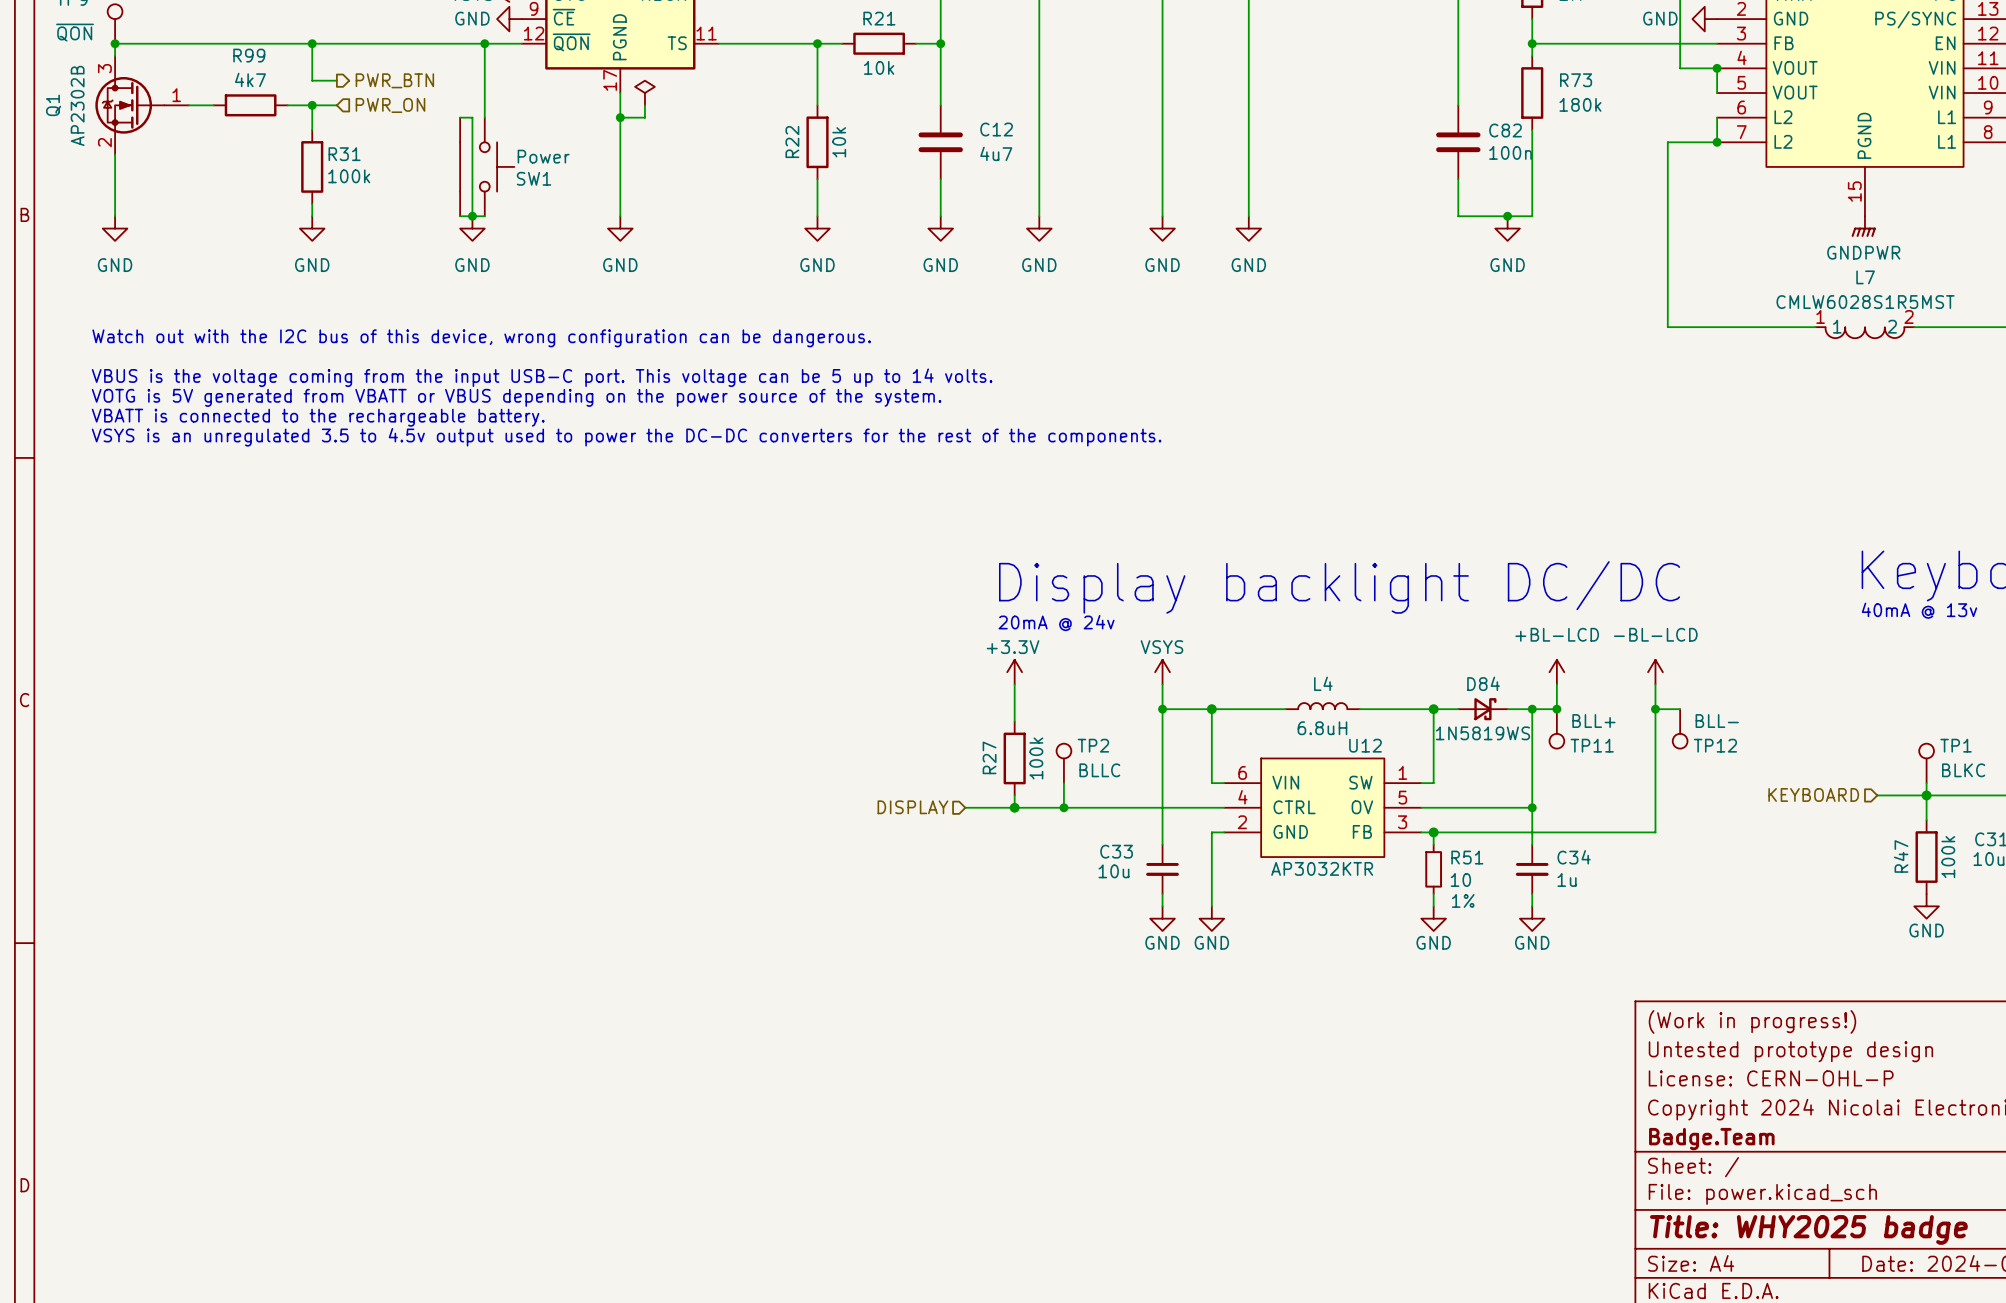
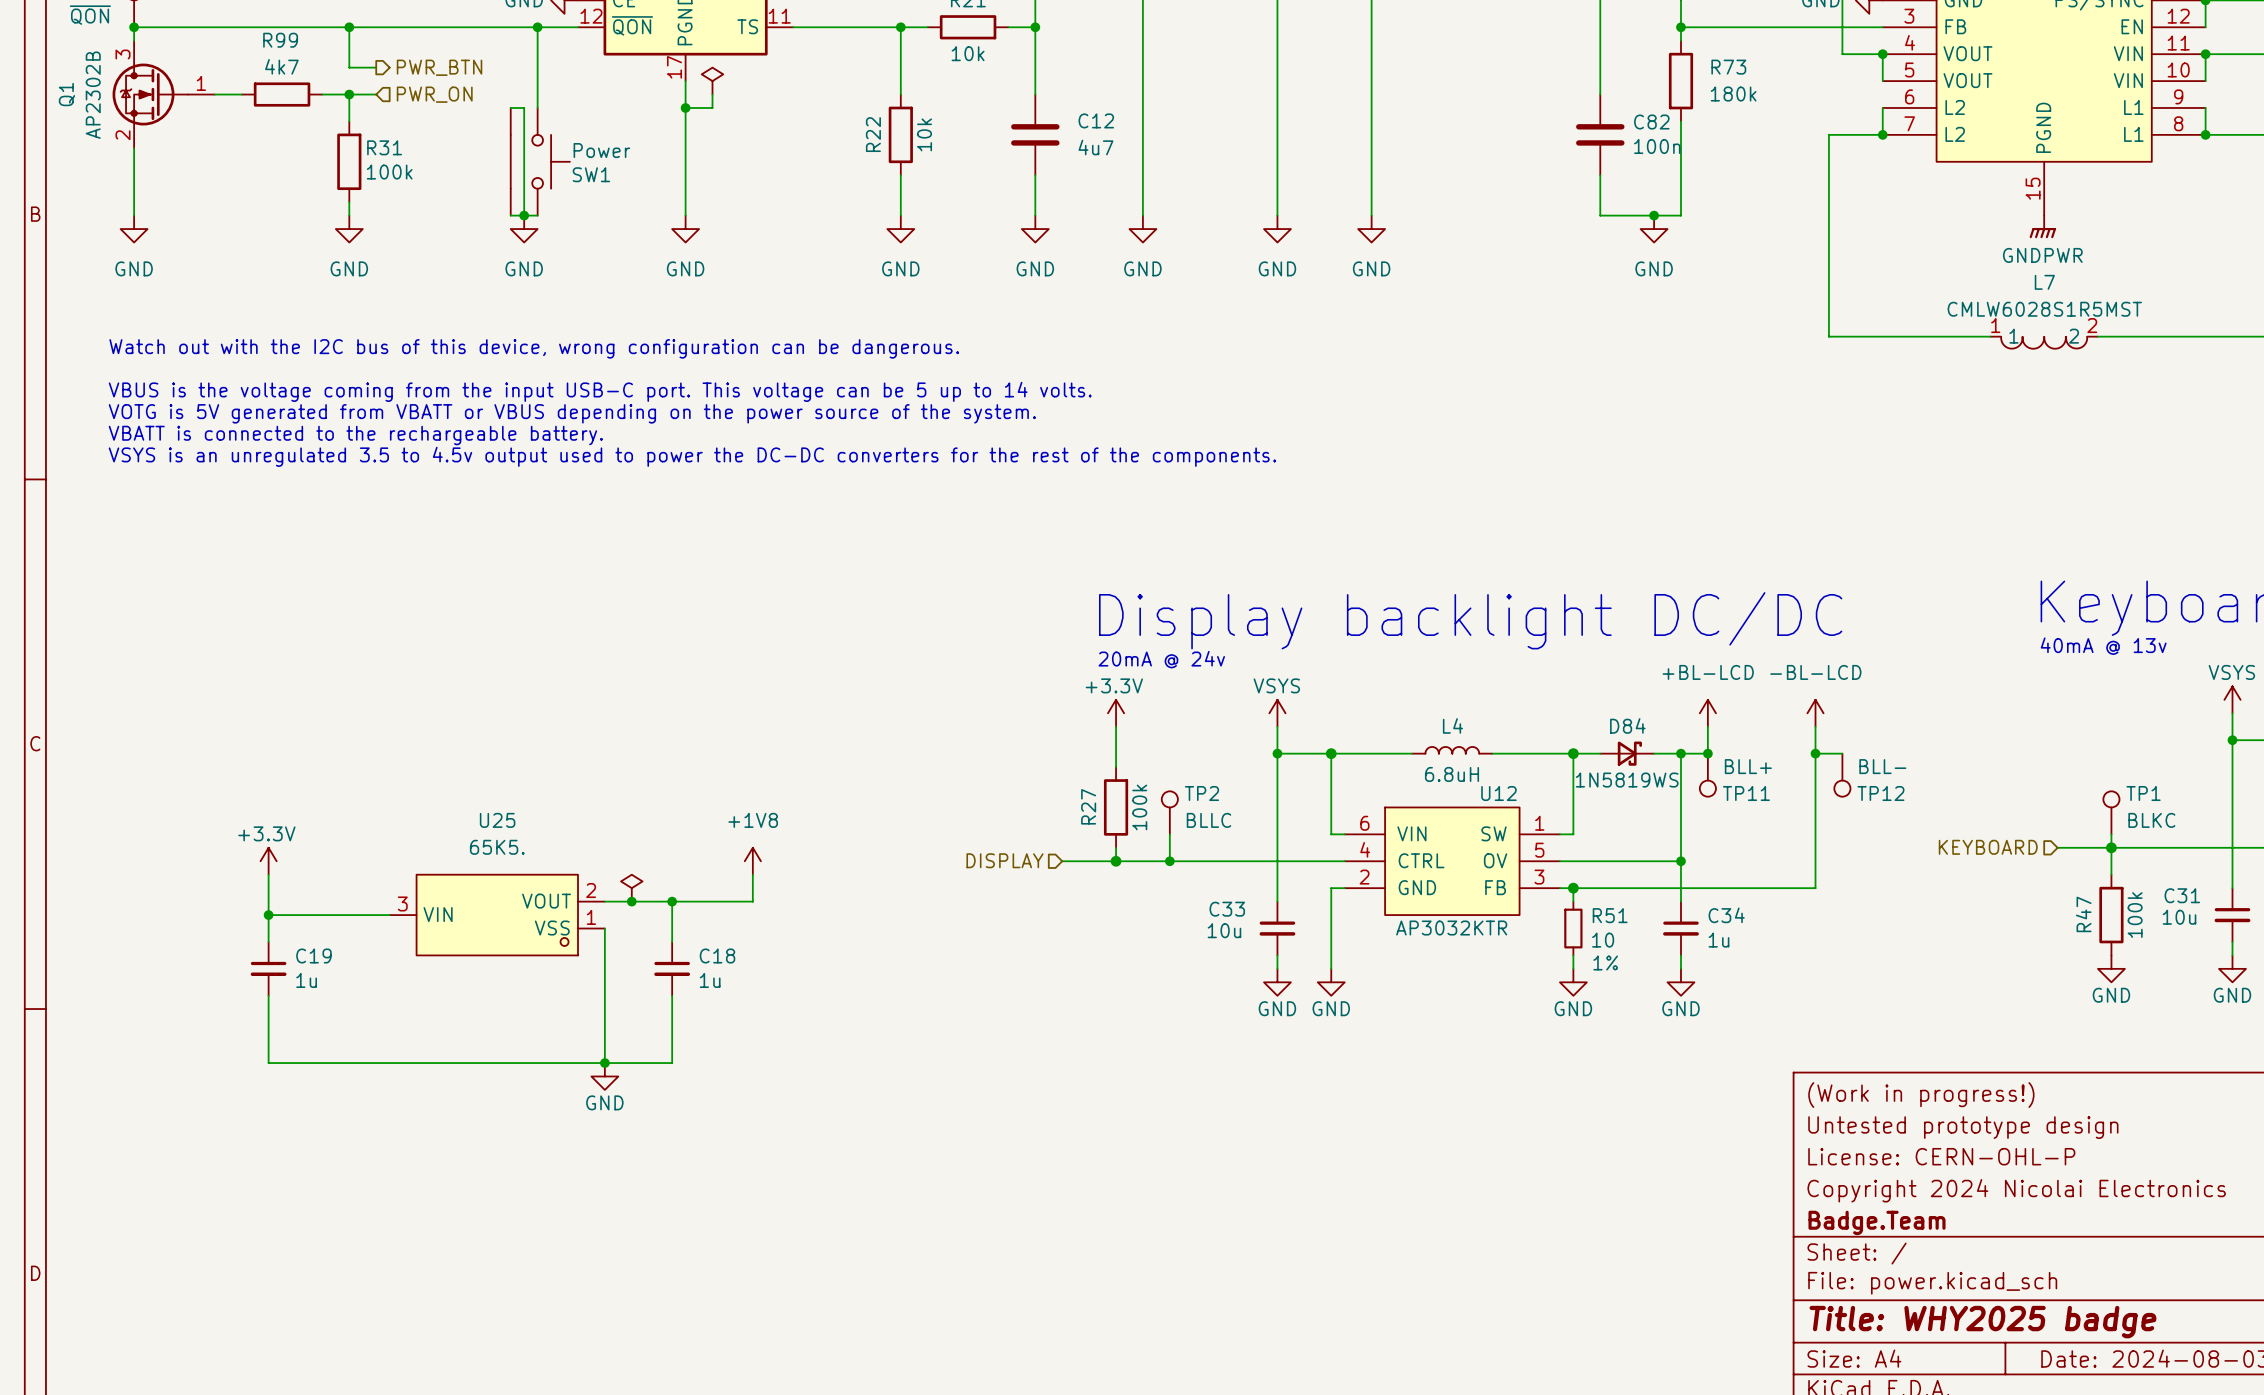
power symbol: none -> +3.3V (268, 861)
power symbol: none -> +1V8 (752, 861)
wire: none -> (268, 874) (268, 941)
wire: none -> (752, 874) (752, 901) (604, 901)
power symbol: none -> (631, 888)
junction: none -> (631, 901)
wire: none -> (672, 901) (672, 941)
junction: none -> (672, 901)
wire: none -> (268, 915) (389, 915)
junction: none -> (268, 915)
U25: none -> 65K5. (497, 915)
wire: none -> (604, 928) (604, 1063)
C19: none -> 1u (268, 968)
C18: none -> 1u (672, 968)
wire: none -> (268, 995) (268, 1063) (672, 1063) (672, 995)
junction: none -> (604, 1063)
power symbol: none -> GND (604, 1076)

